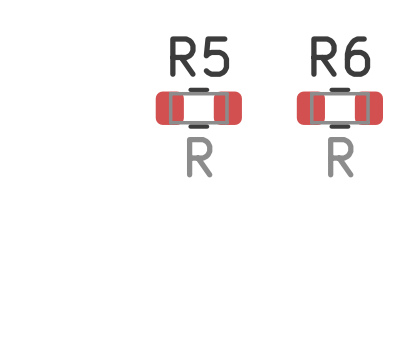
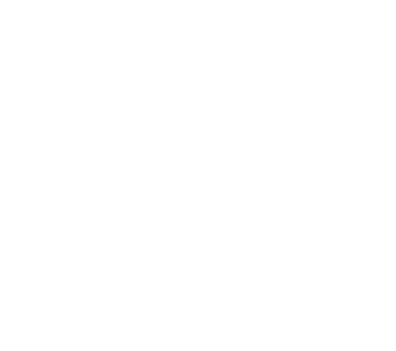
R5: R (198, 108) -> none
R6: R (339, 108) -> none

